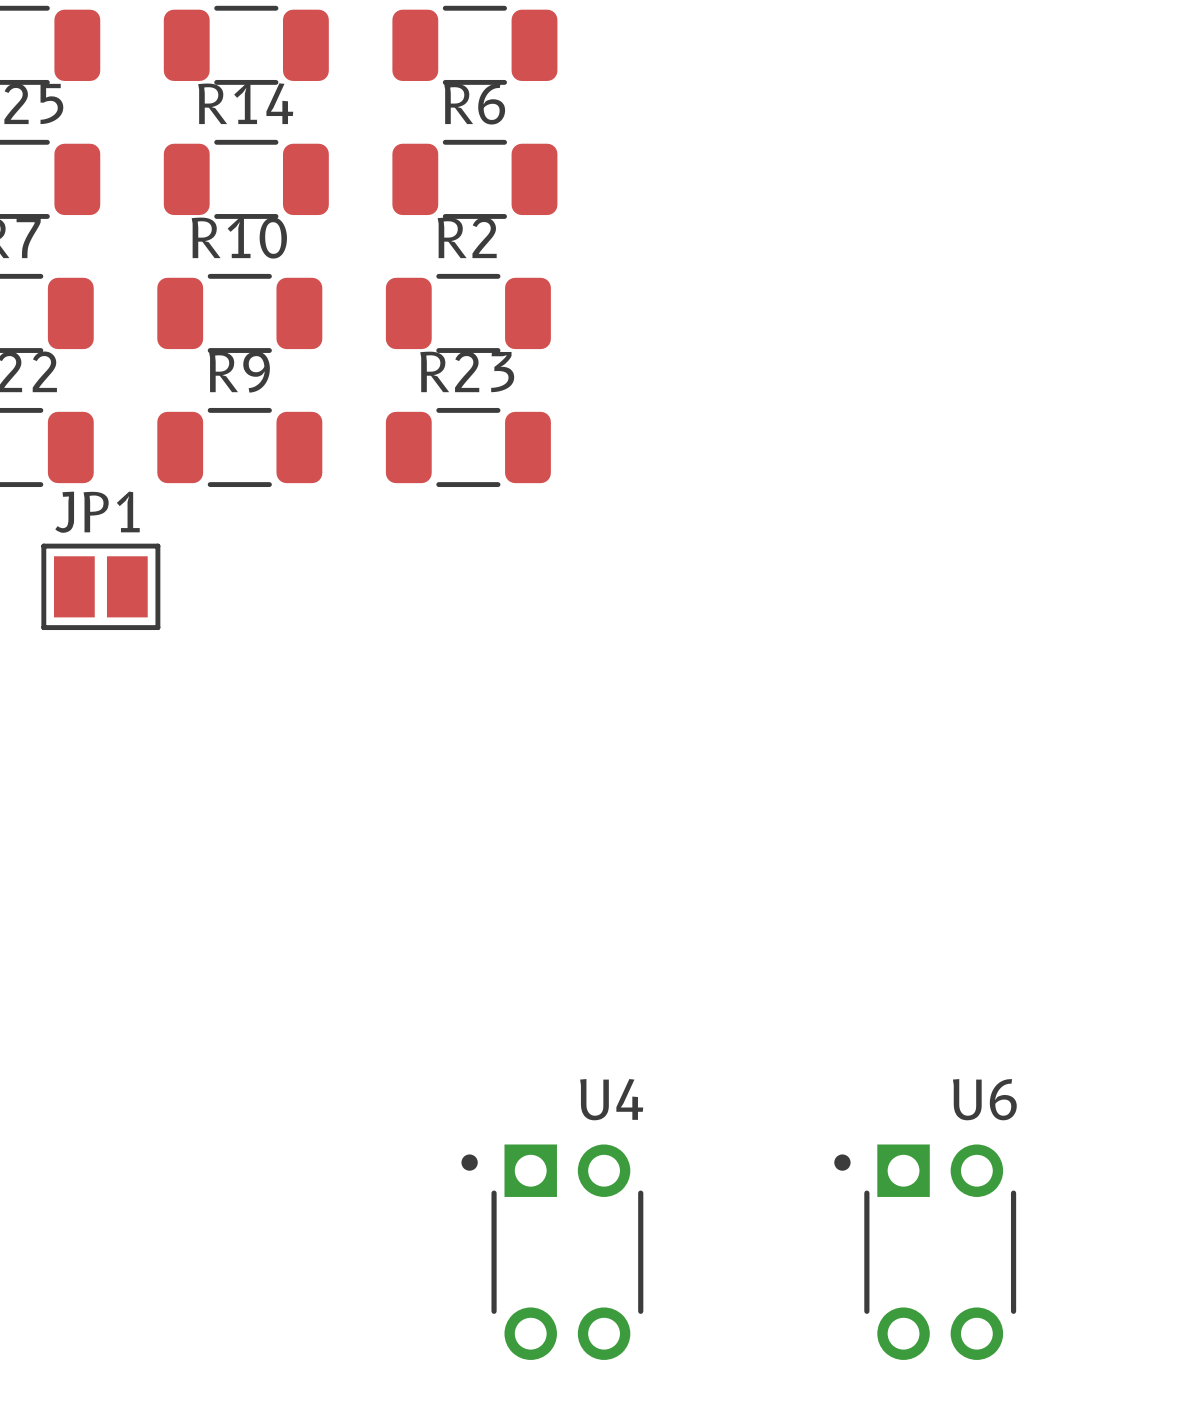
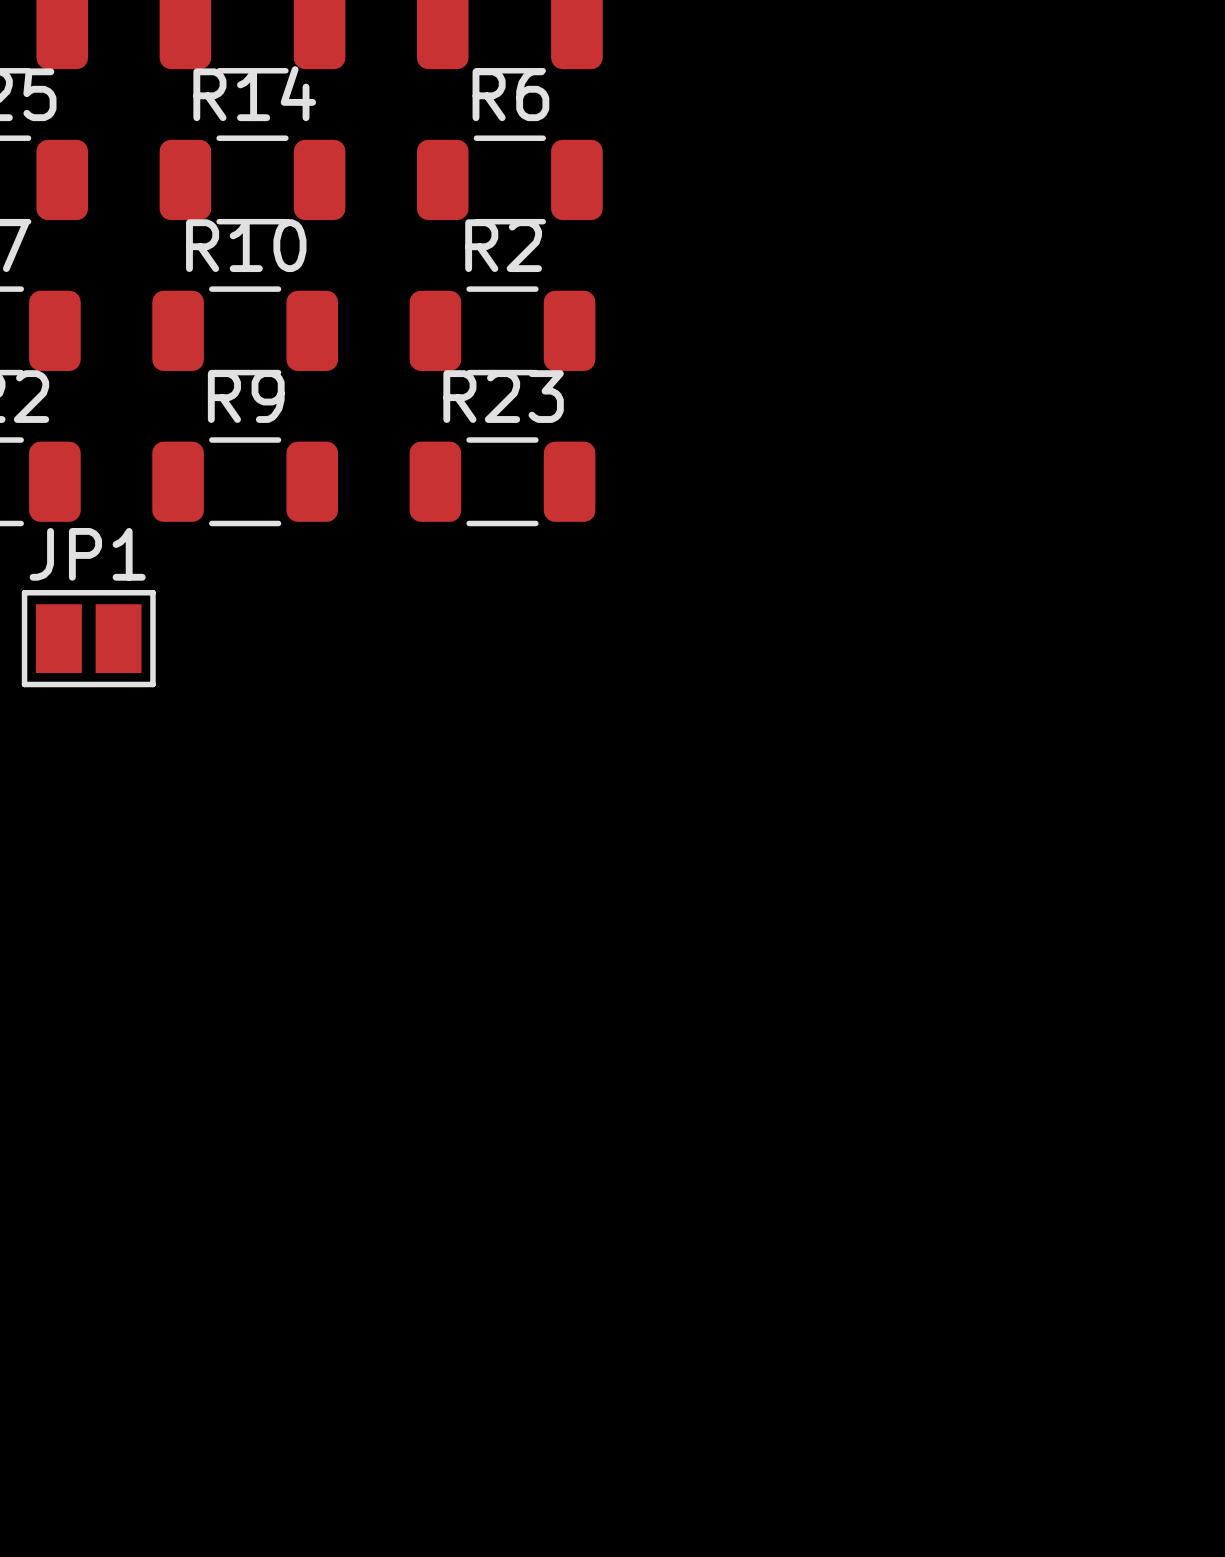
U4: (552, 1252) -> none
U6: (925, 1252) -> none

